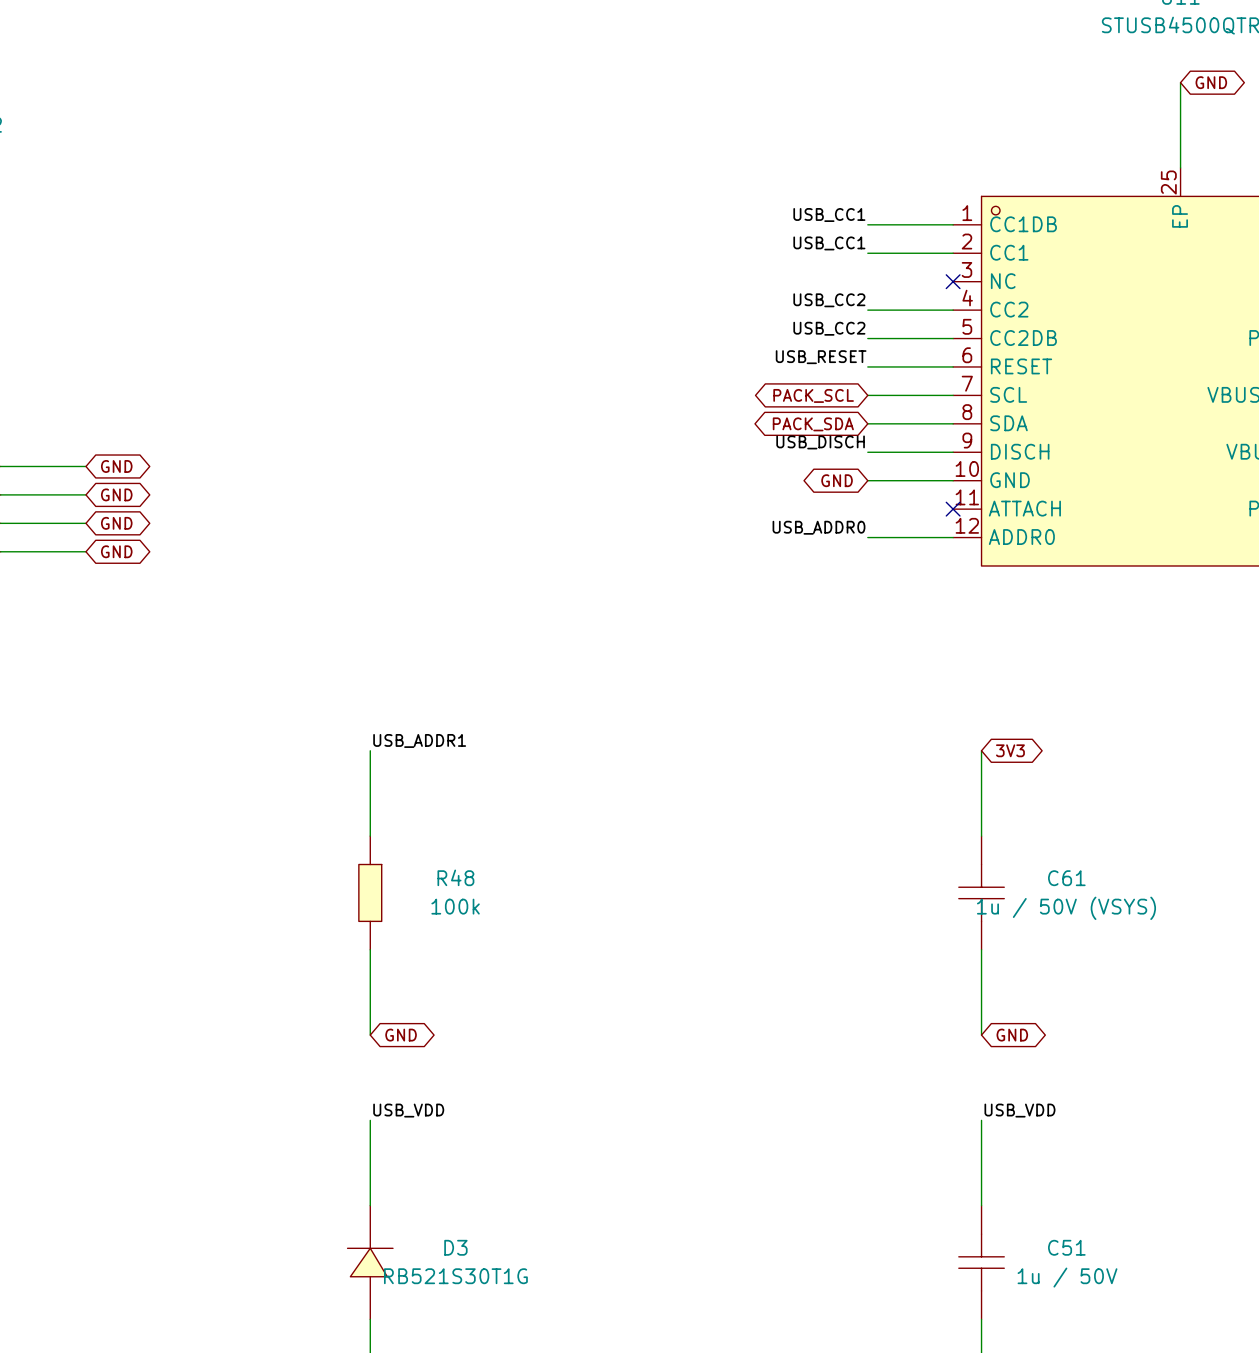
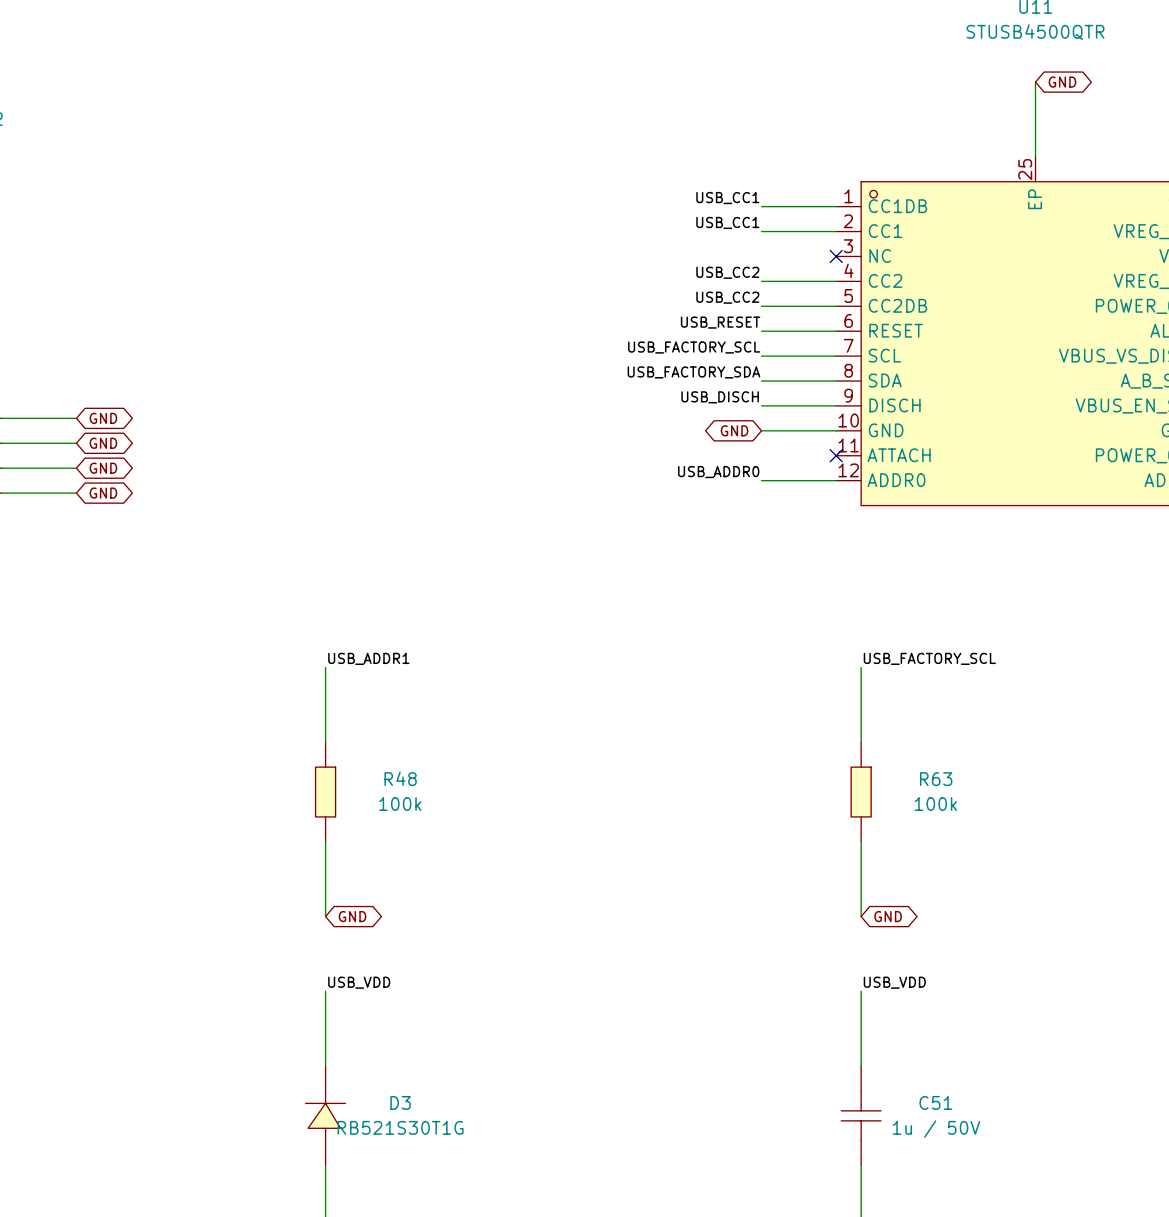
label: none -> USB_FACTORY_SCL (694, 347)
global label: PACK_SCL (813, 395) -> none
label: none -> USB_FACTORY_SDA (693, 372)
global label: PACK_SDA (813, 424) -> none
label: none -> USB_FACTORY_SCL (929, 658)
global label: 3V3 (1010, 750) -> none
C61: 1u / 50V (VSYS) (981, 892) -> none
R63: none -> 100k (861, 792)

